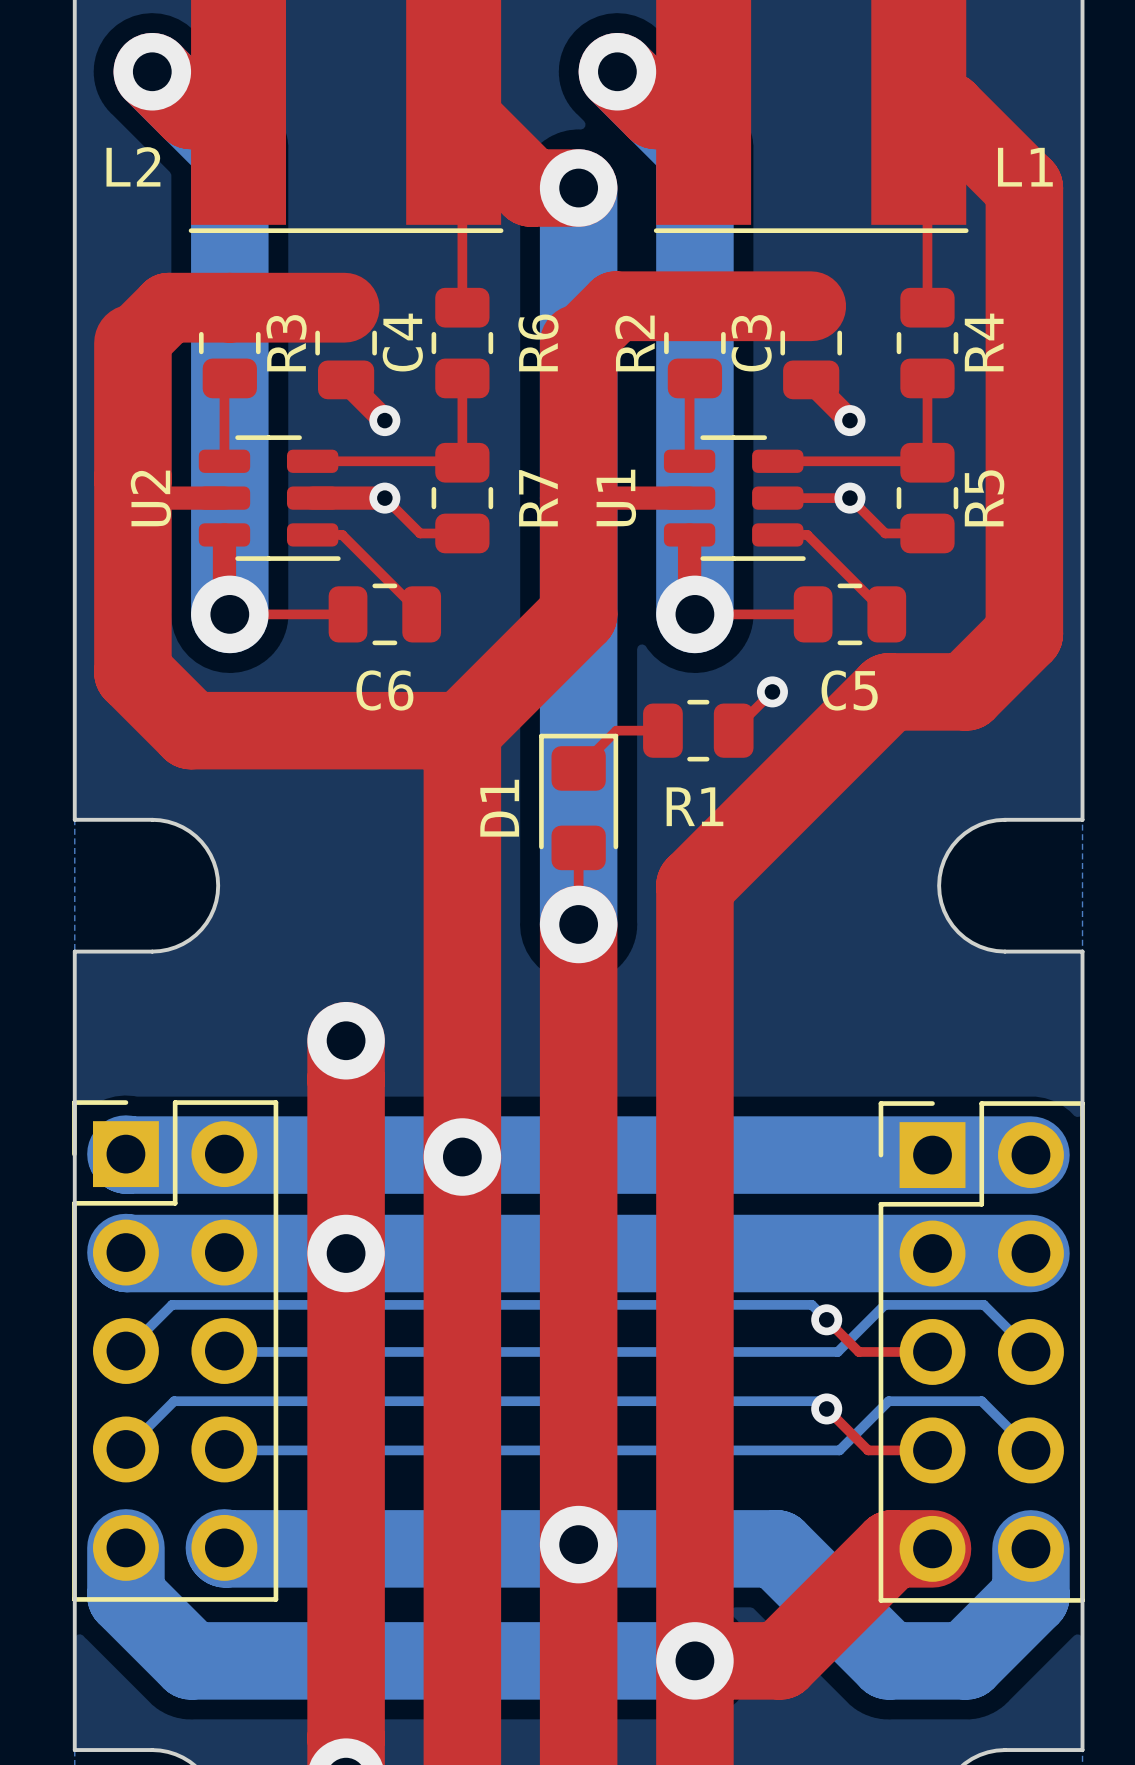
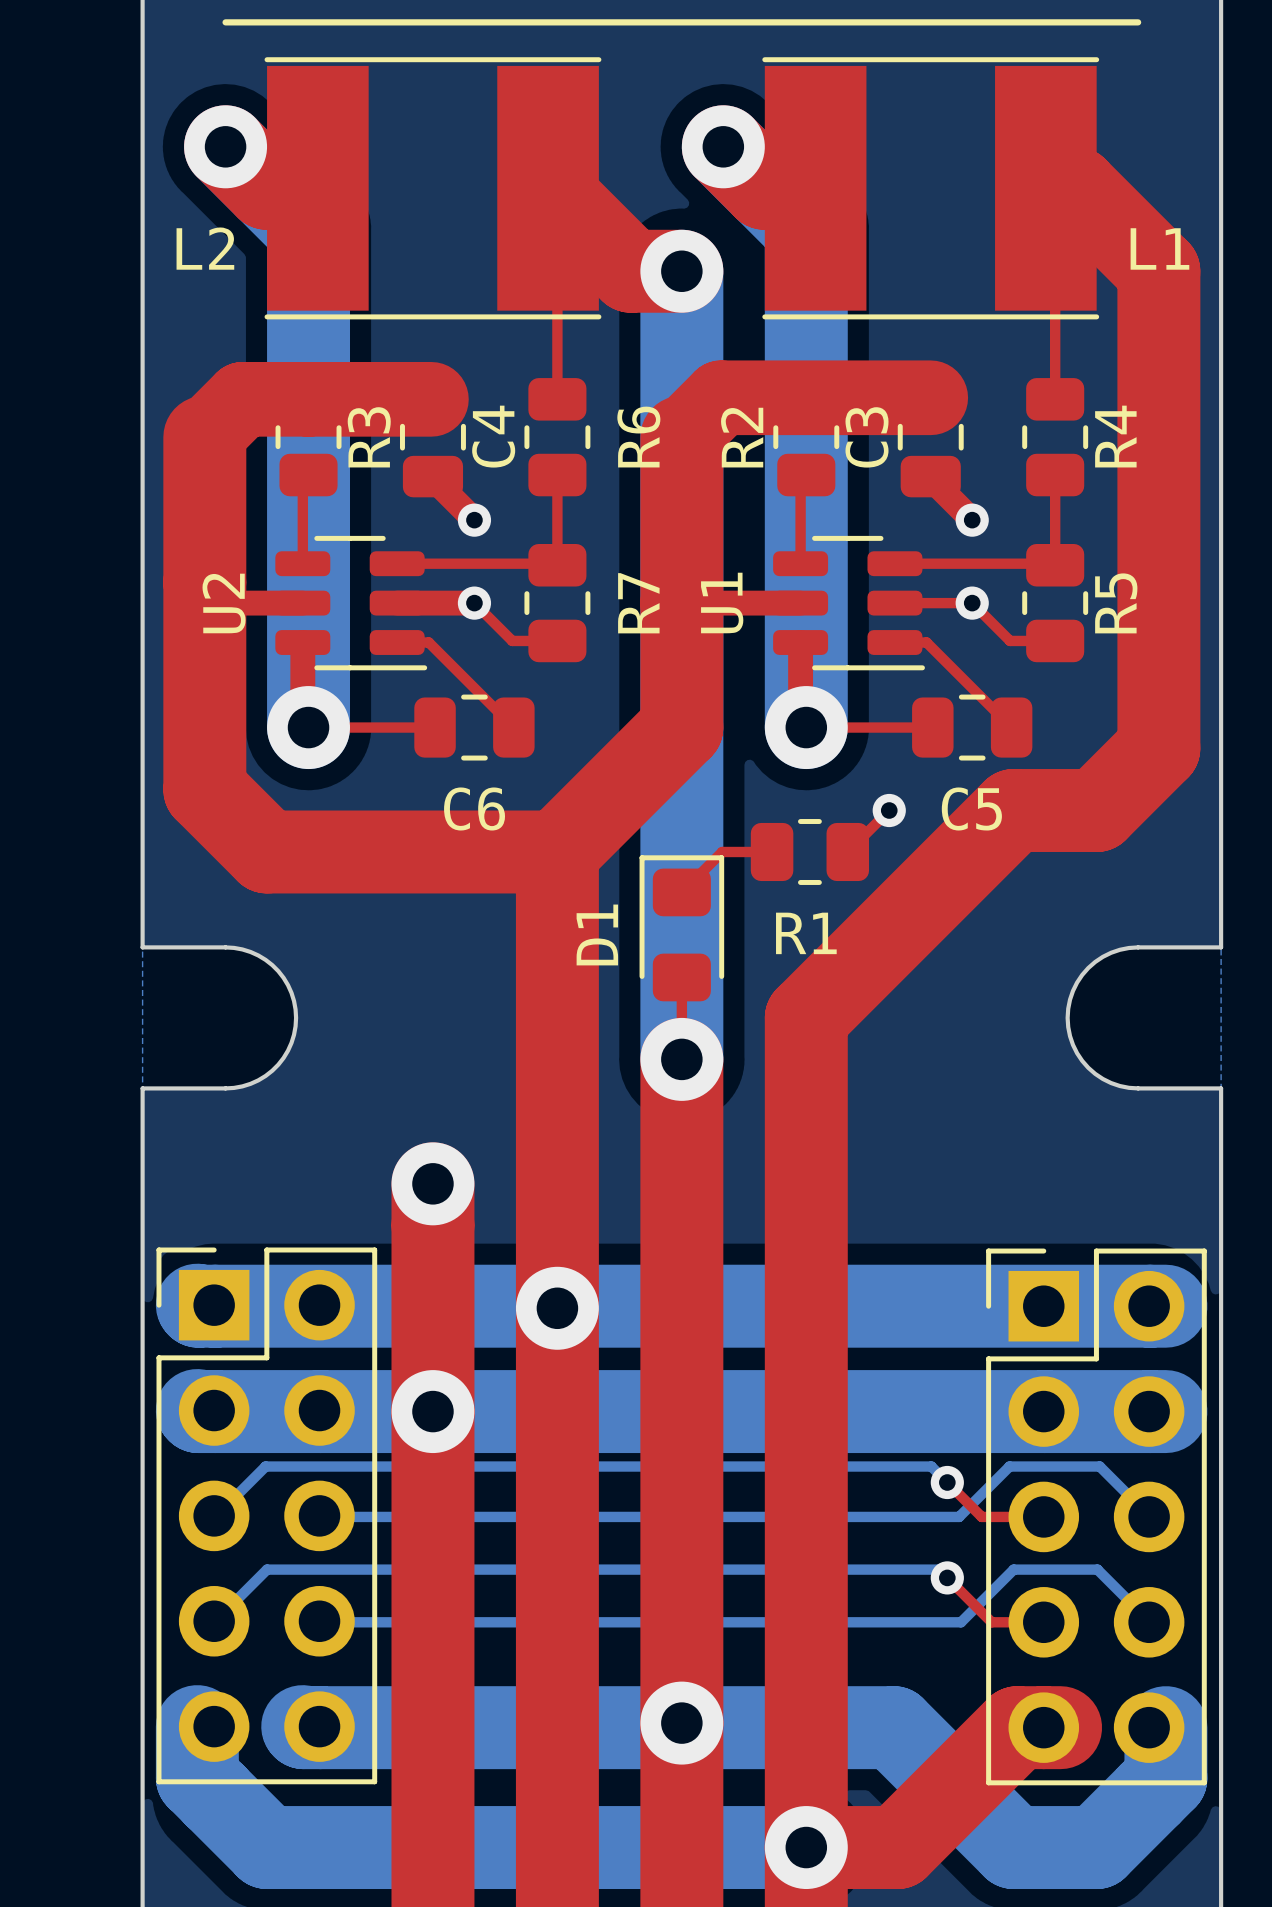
bottom track: (189, 1304) (172, 1304) (125, 1351) -> (265, 1466) (215, 1516)
bottom track: (969, 1304) (983, 1304) (1030, 1351) -> (1099, 1466) (1150, 1516)
part position: (175, 1351) -> (266, 1515)
part position: (981, 1351) -> (1096, 1516)
bottom track: (191, 1401) (174, 1401) (125, 1449) -> (267, 1569) (215, 1621)
bottom track: (967, 1401) (981, 1401) (1030, 1450) -> (1097, 1569) (1150, 1622)

